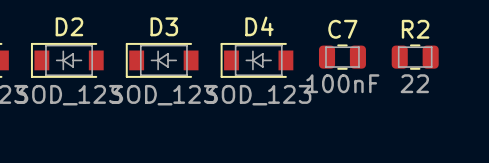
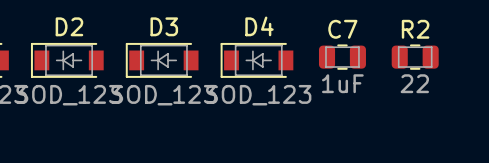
C7 value: 100nF (342, 83) -> 1uF (342, 83)

